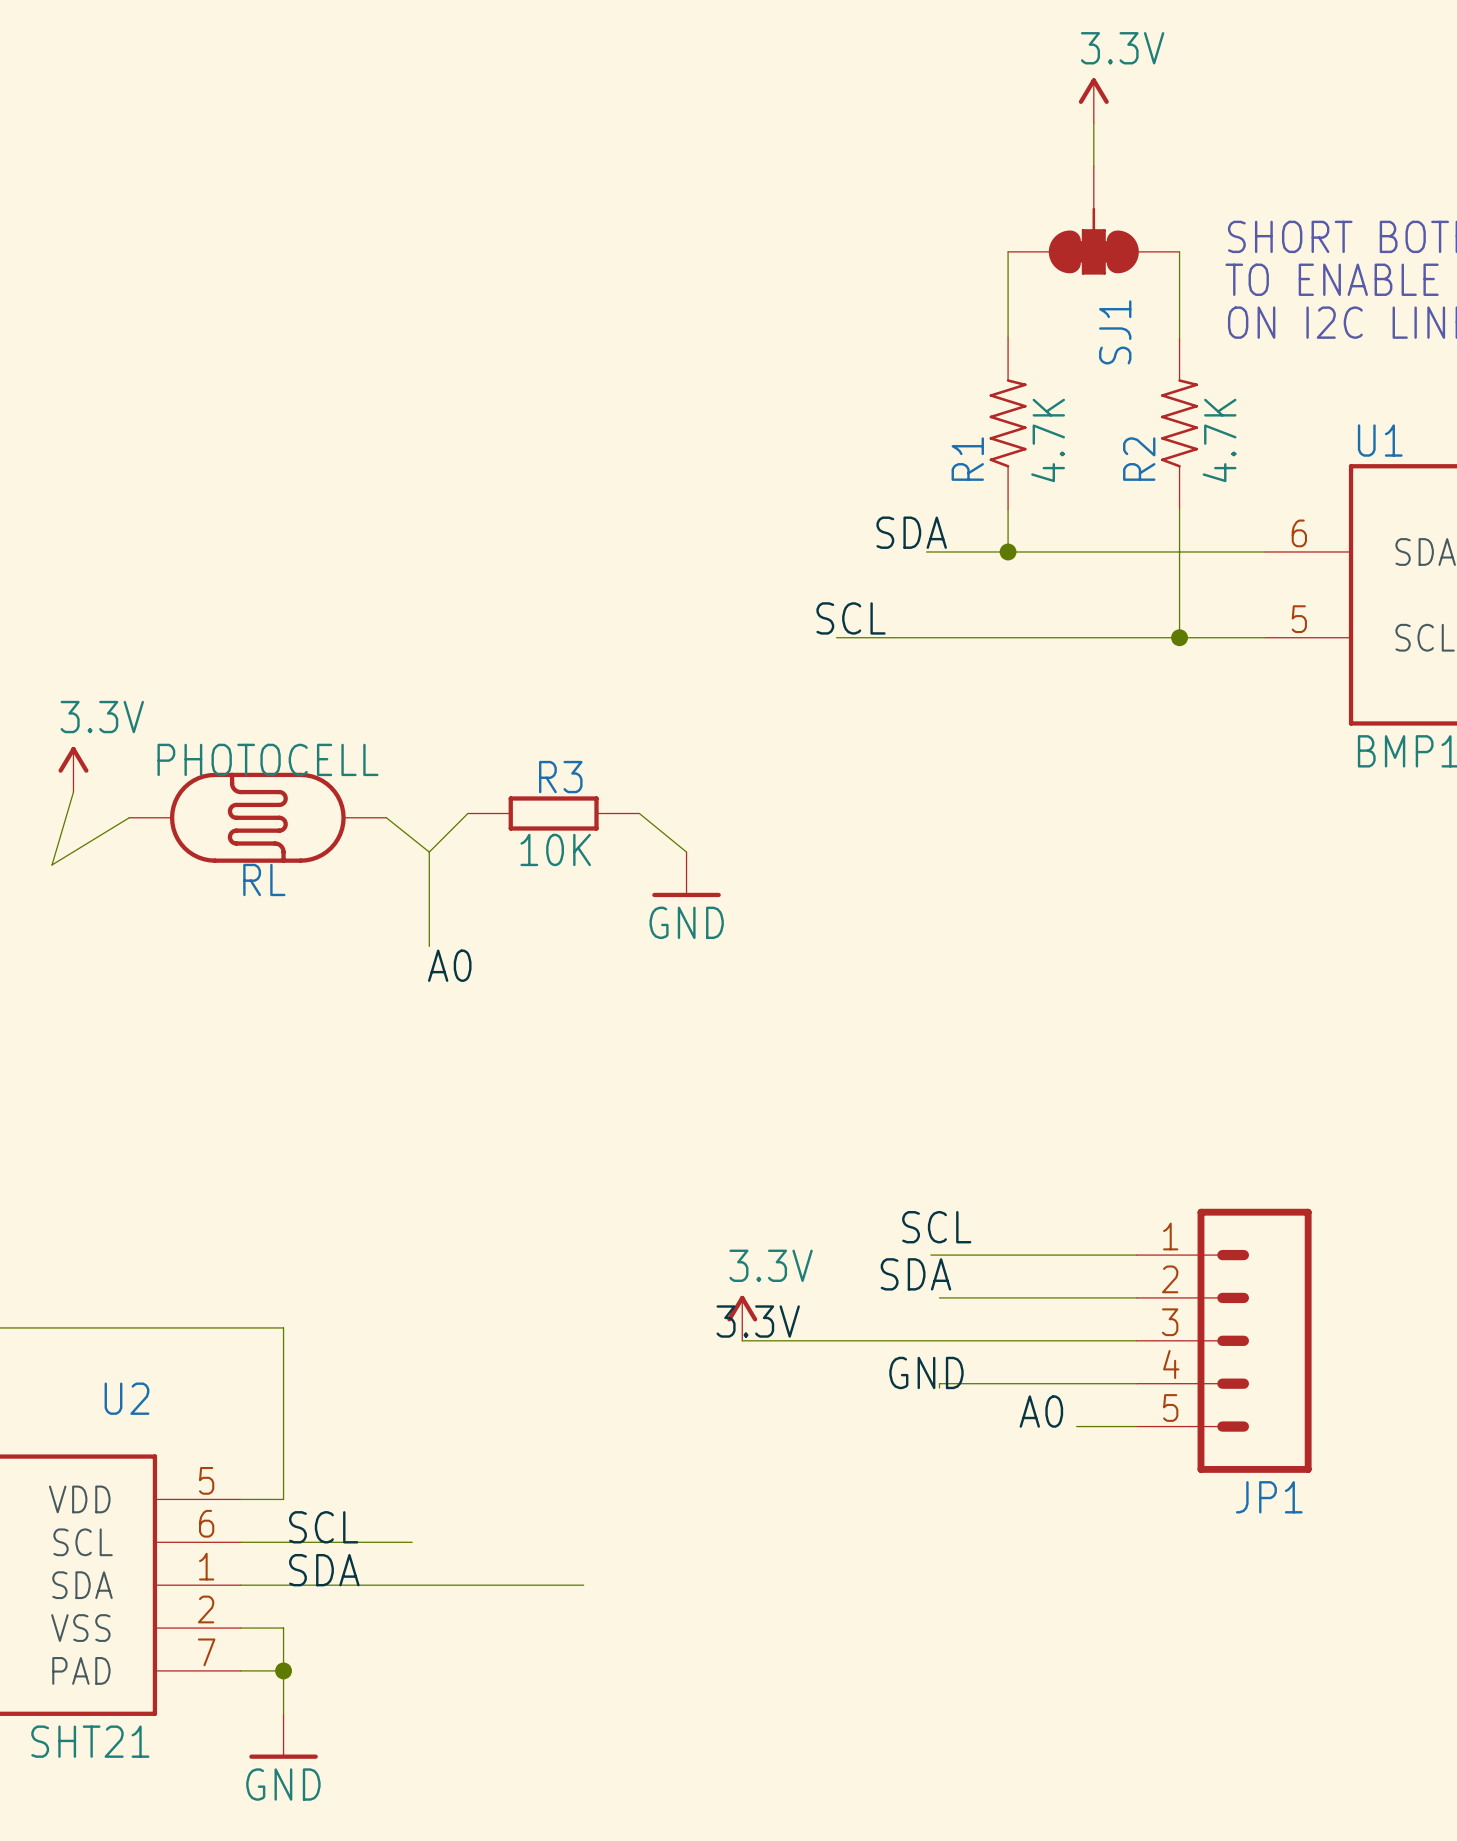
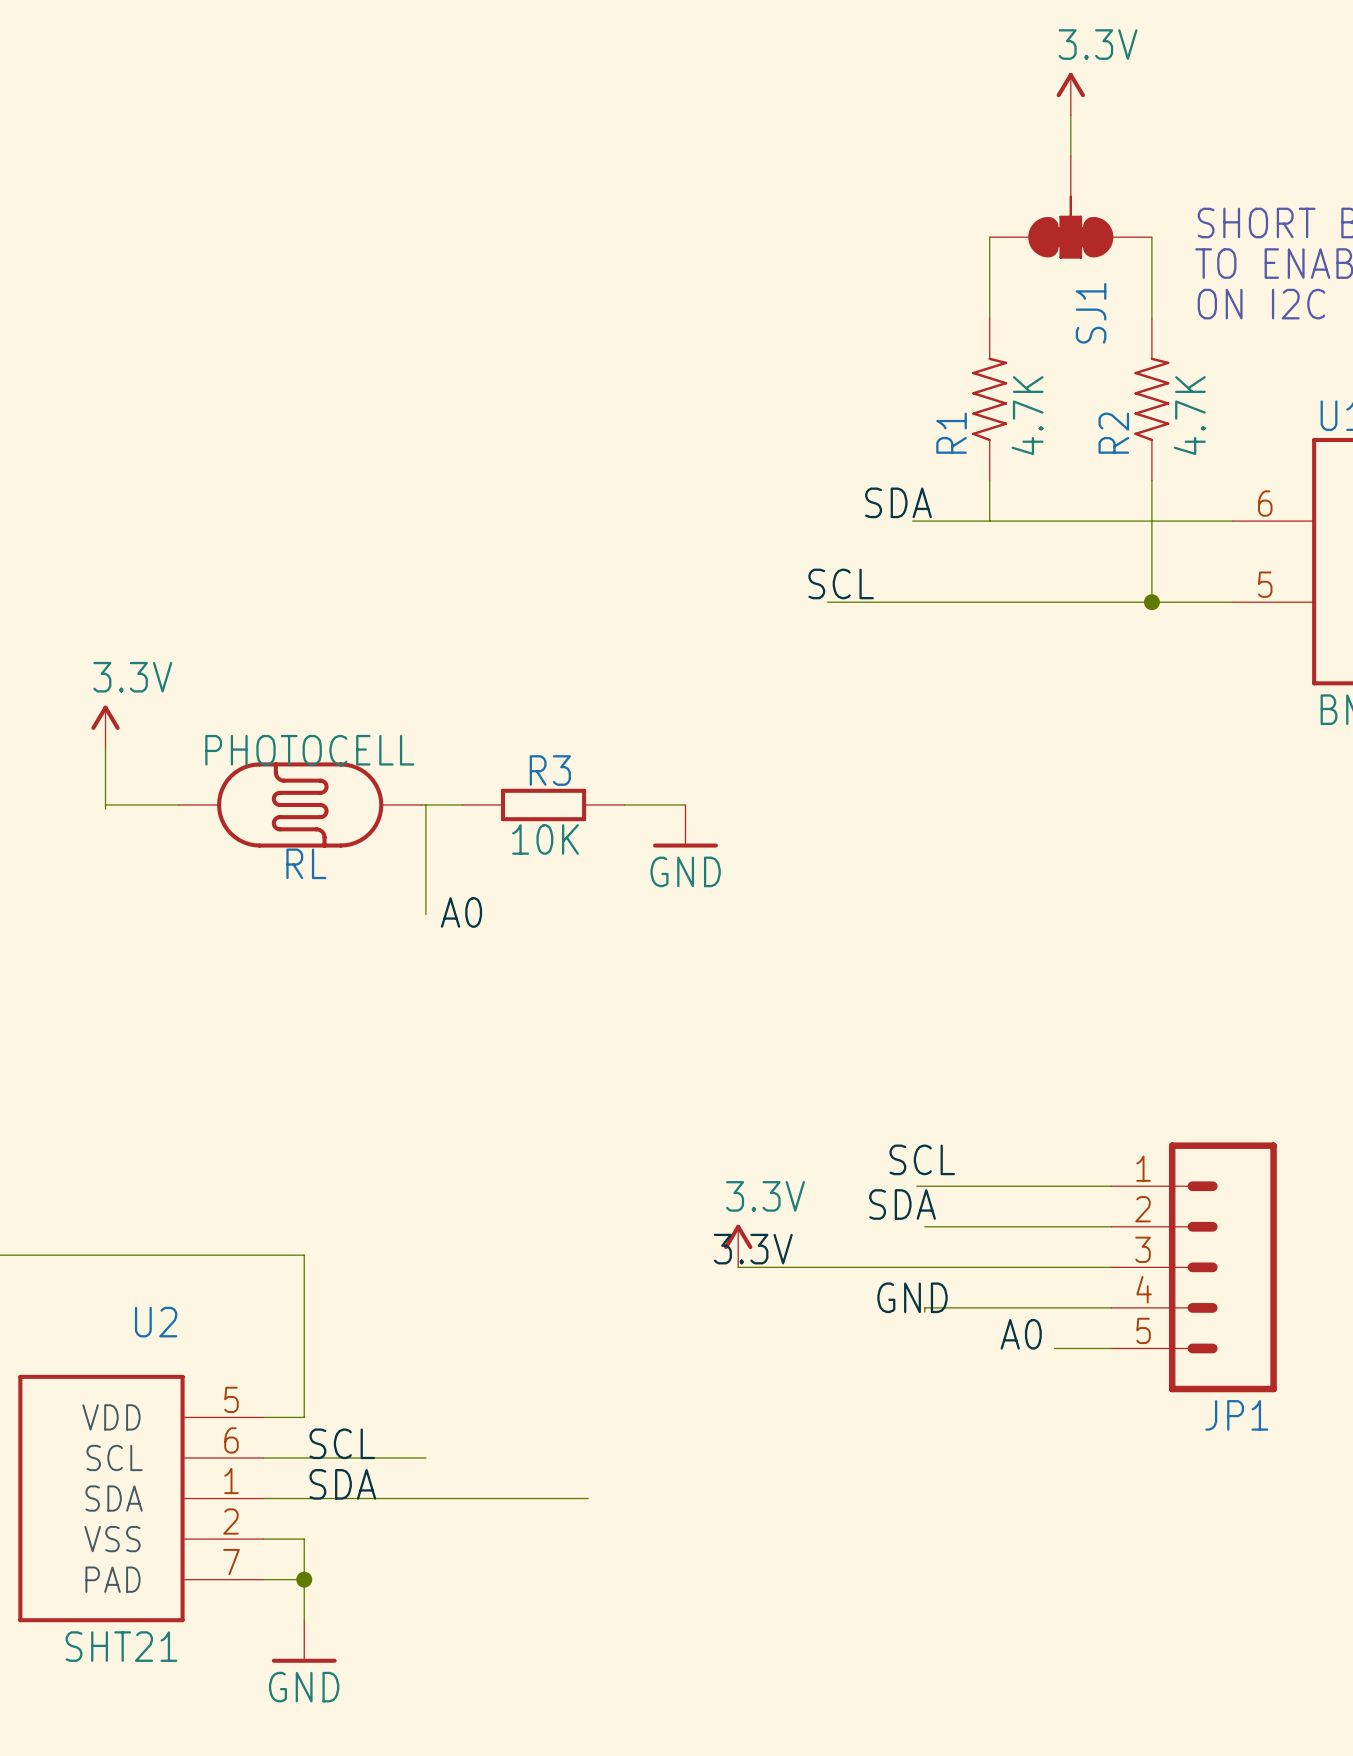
junction: (1008, 551) -> none
wire: (73, 792) (52, 864) (129, 817) -> (105, 748) (105, 809)
wire: (467, 813) (429, 852) -> none
R3 position: (553, 813) -> (543, 804)
wire: (639, 813) (686, 852) -> (624, 804) (685, 804)
RL position: (257, 817) -> (300, 804)
wire: (386, 817) (429, 852) -> none
wire: none -> (105, 804) (178, 804)
wire: none -> (421, 804) (462, 804)
wire: none -> (425, 804) (425, 914)
wire: (429, 852) (429, 946) -> none

